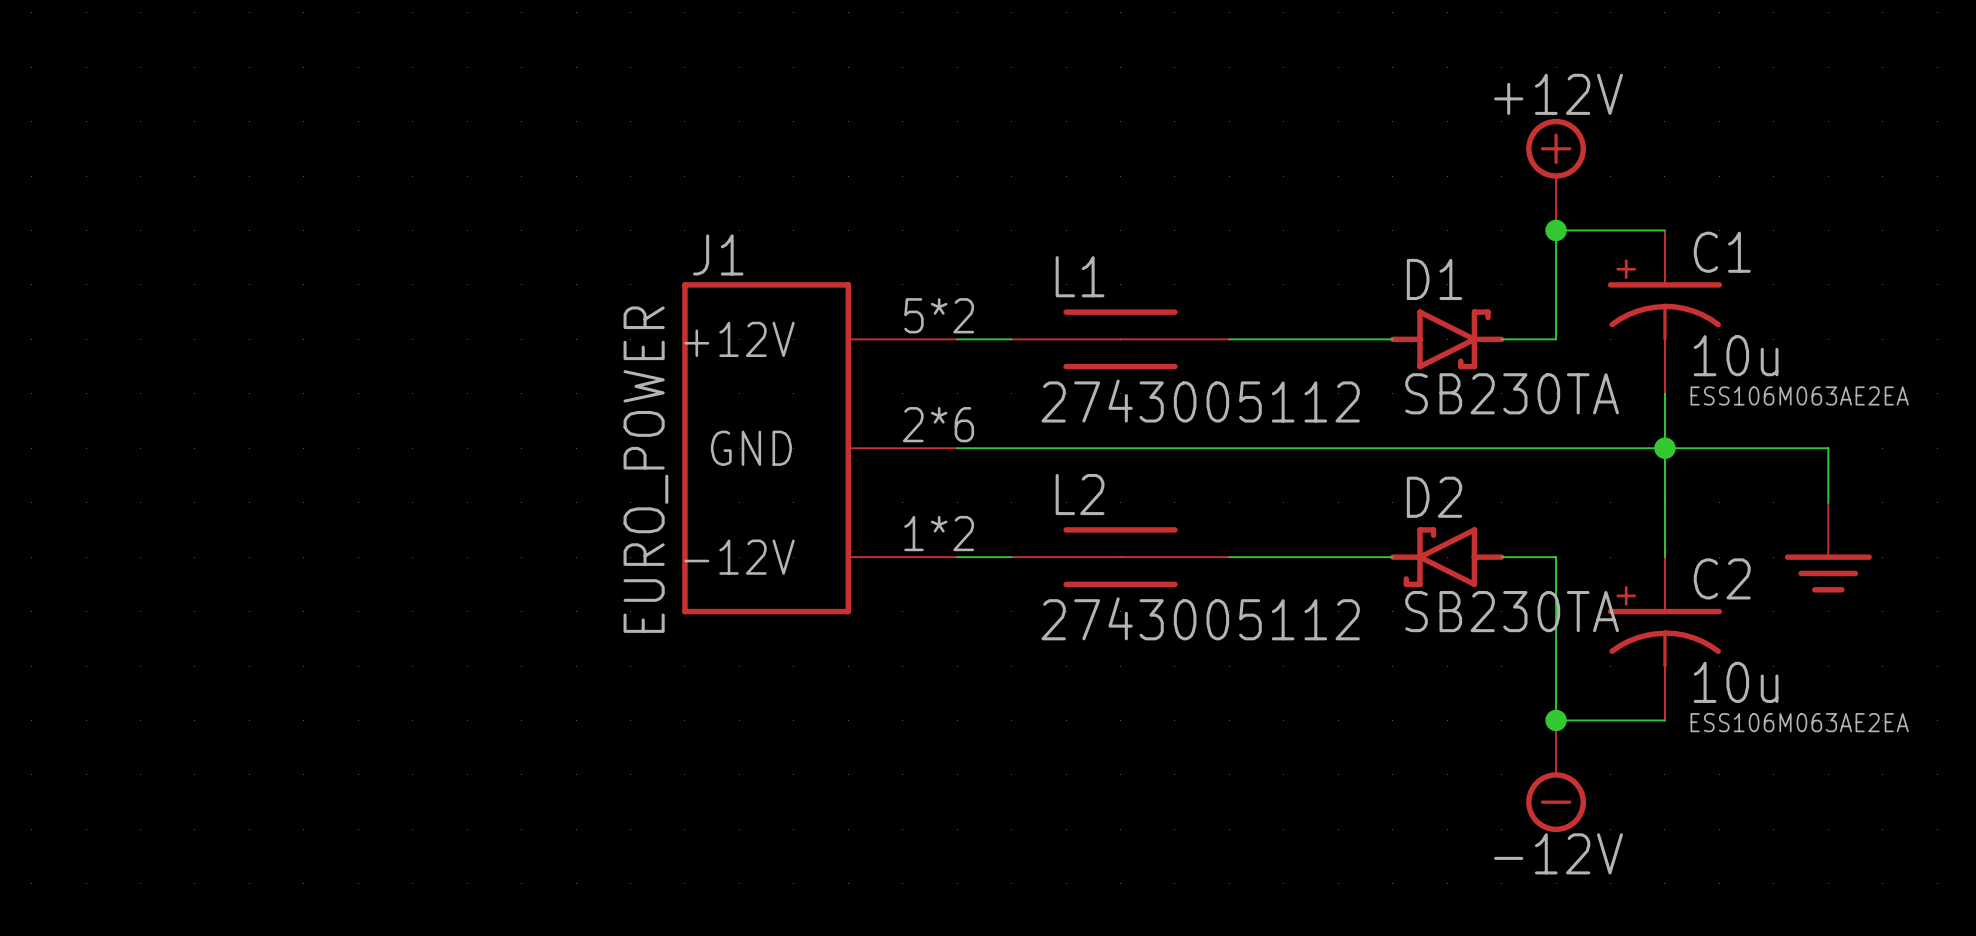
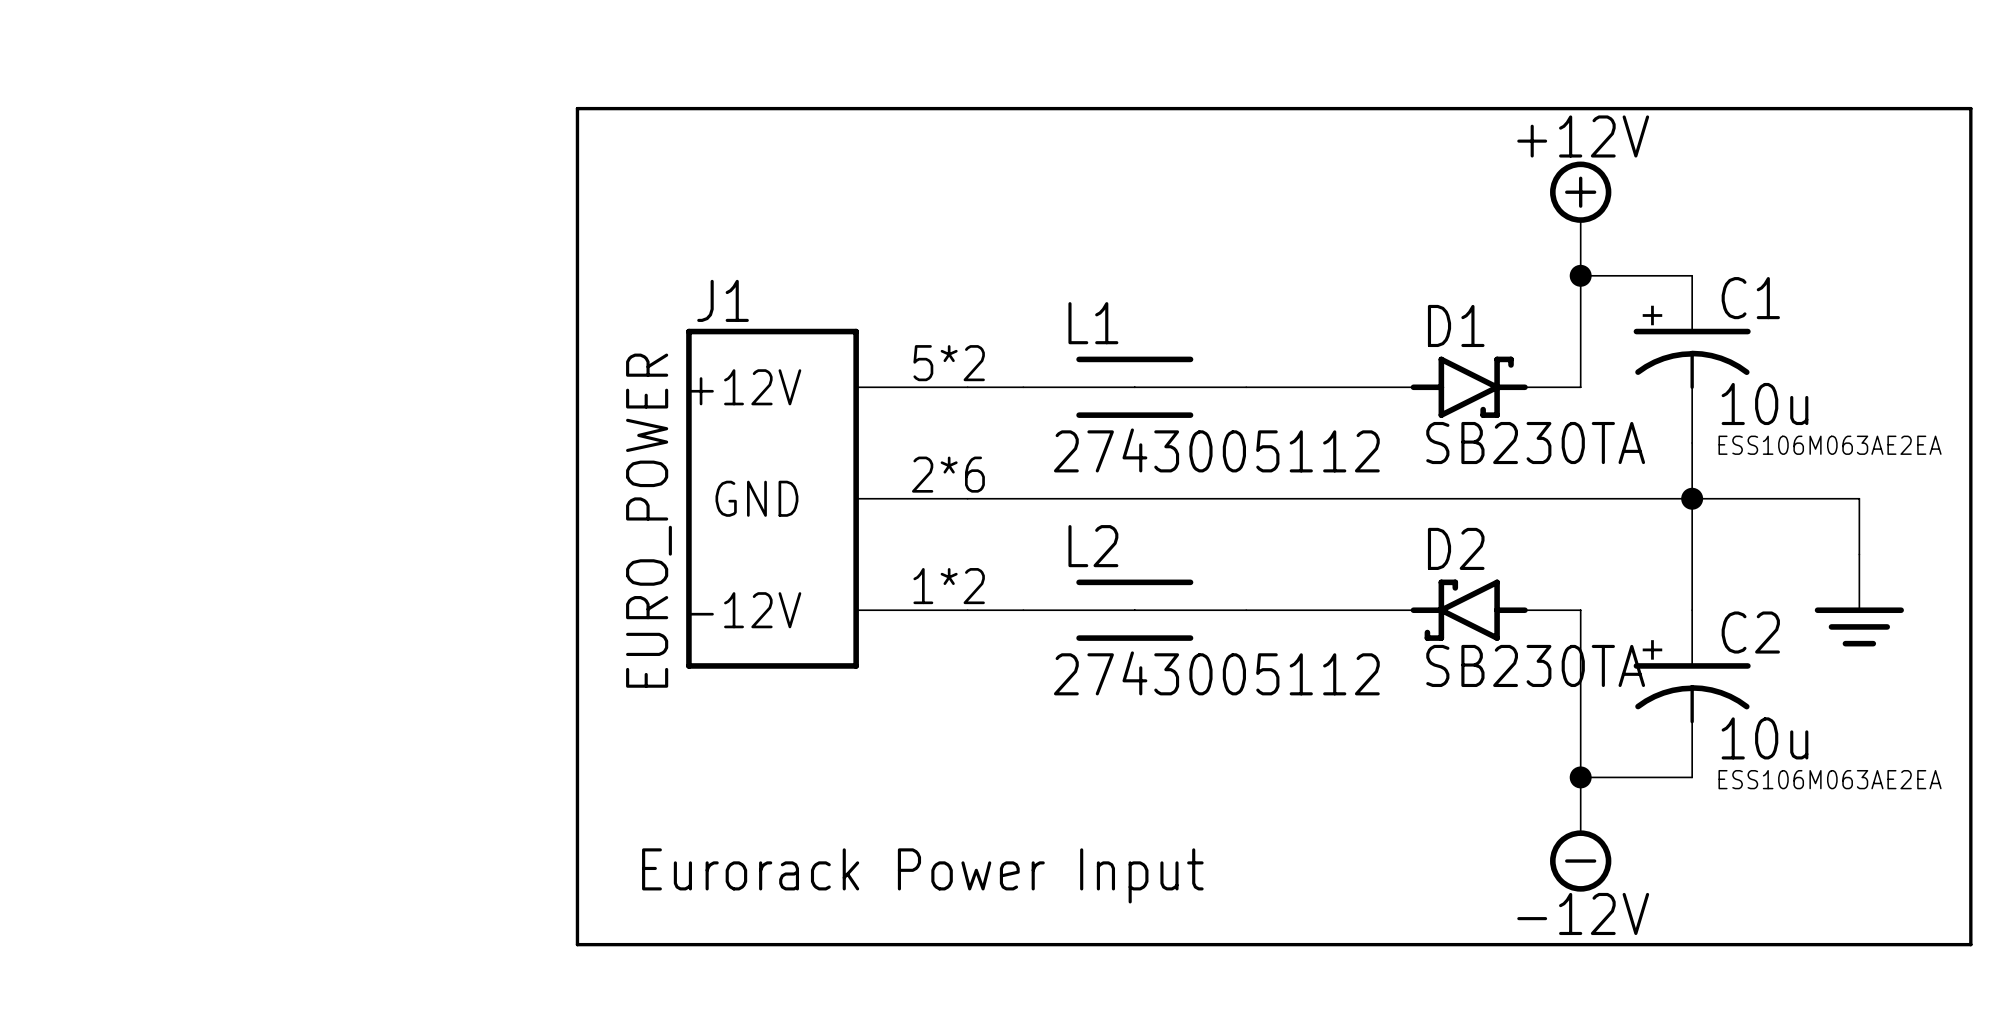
line: none -> (577, 108) (577, 944) (1970, 944) (1970, 108) (577, 108)
text: none -> Eurorack Power Input (922, 875)

